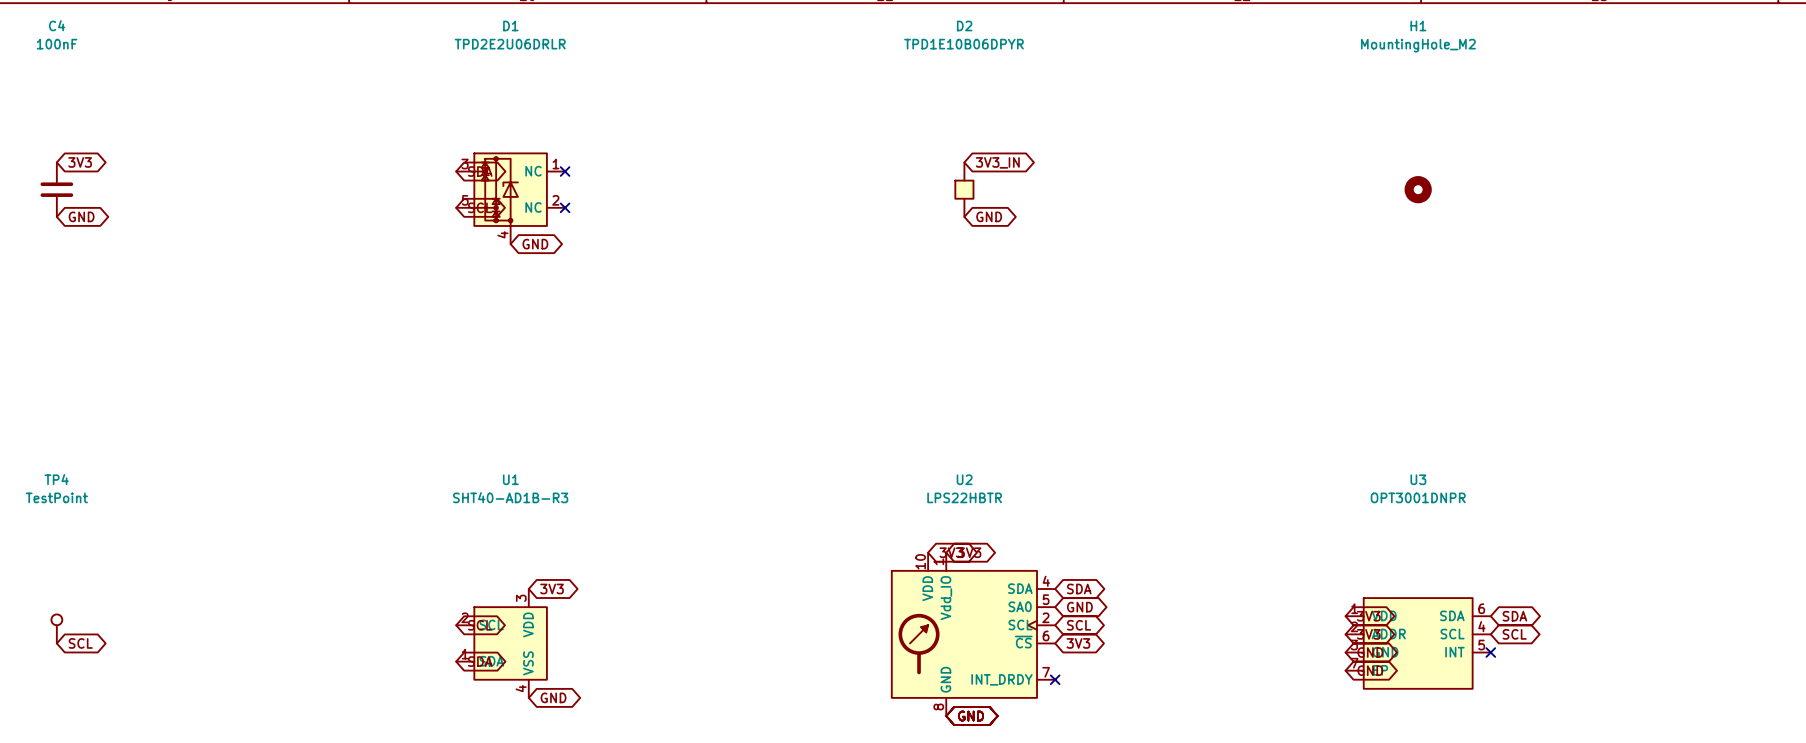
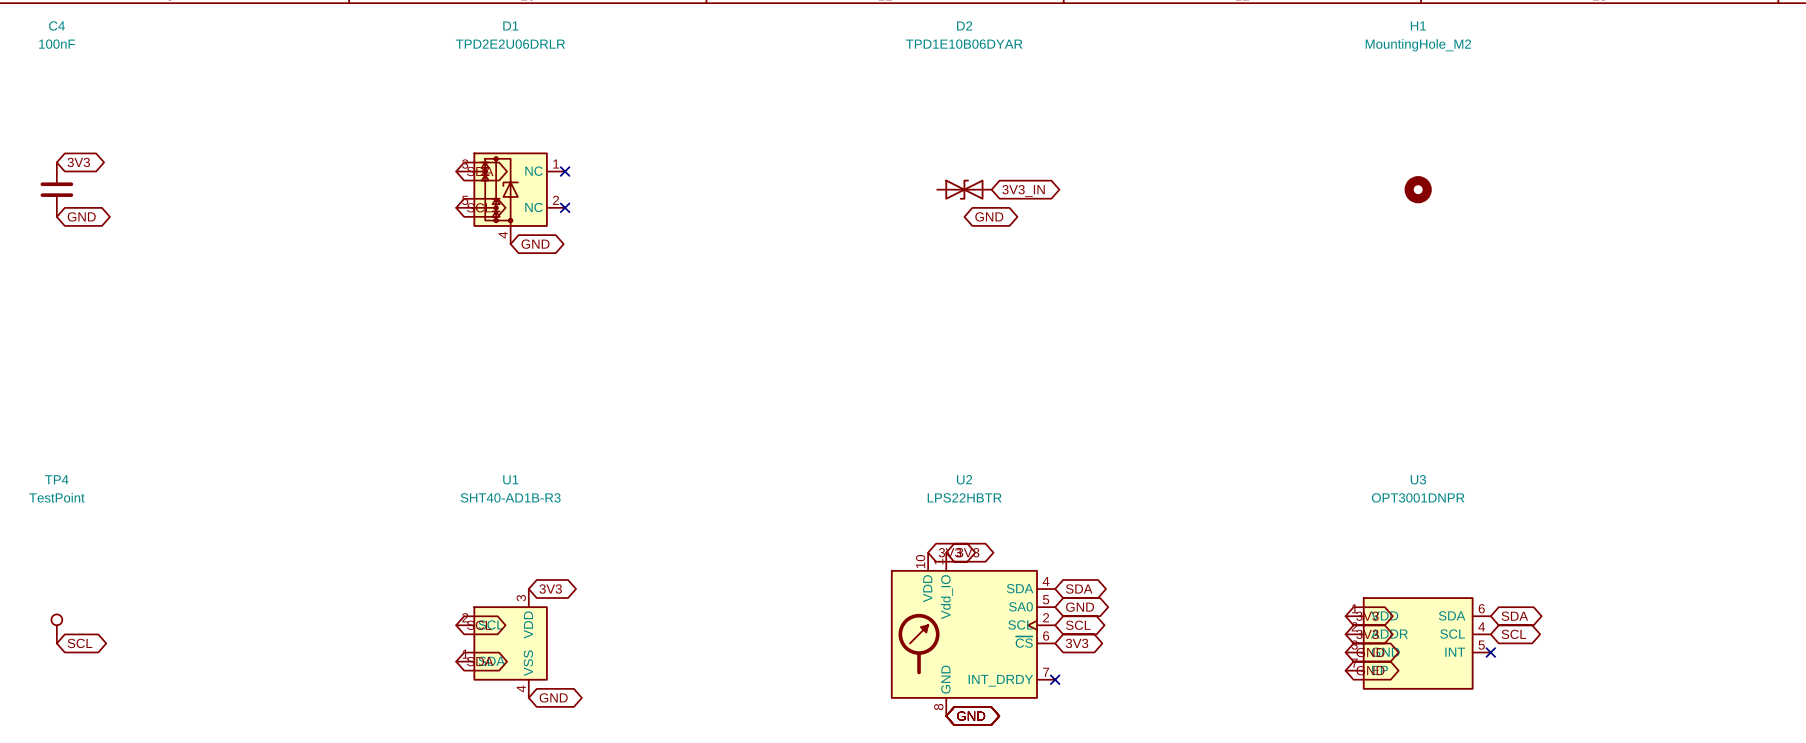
D2 value: TPD1E10B06DPYR (963, 44) -> TPD1E10B06DYAR (964, 44)
D2 symbol: [954, 162, 975, 217] -> [937, 179, 992, 200]
global label position: 3V3_IN (997, 162) -> 3V3_IN (1023, 190)

